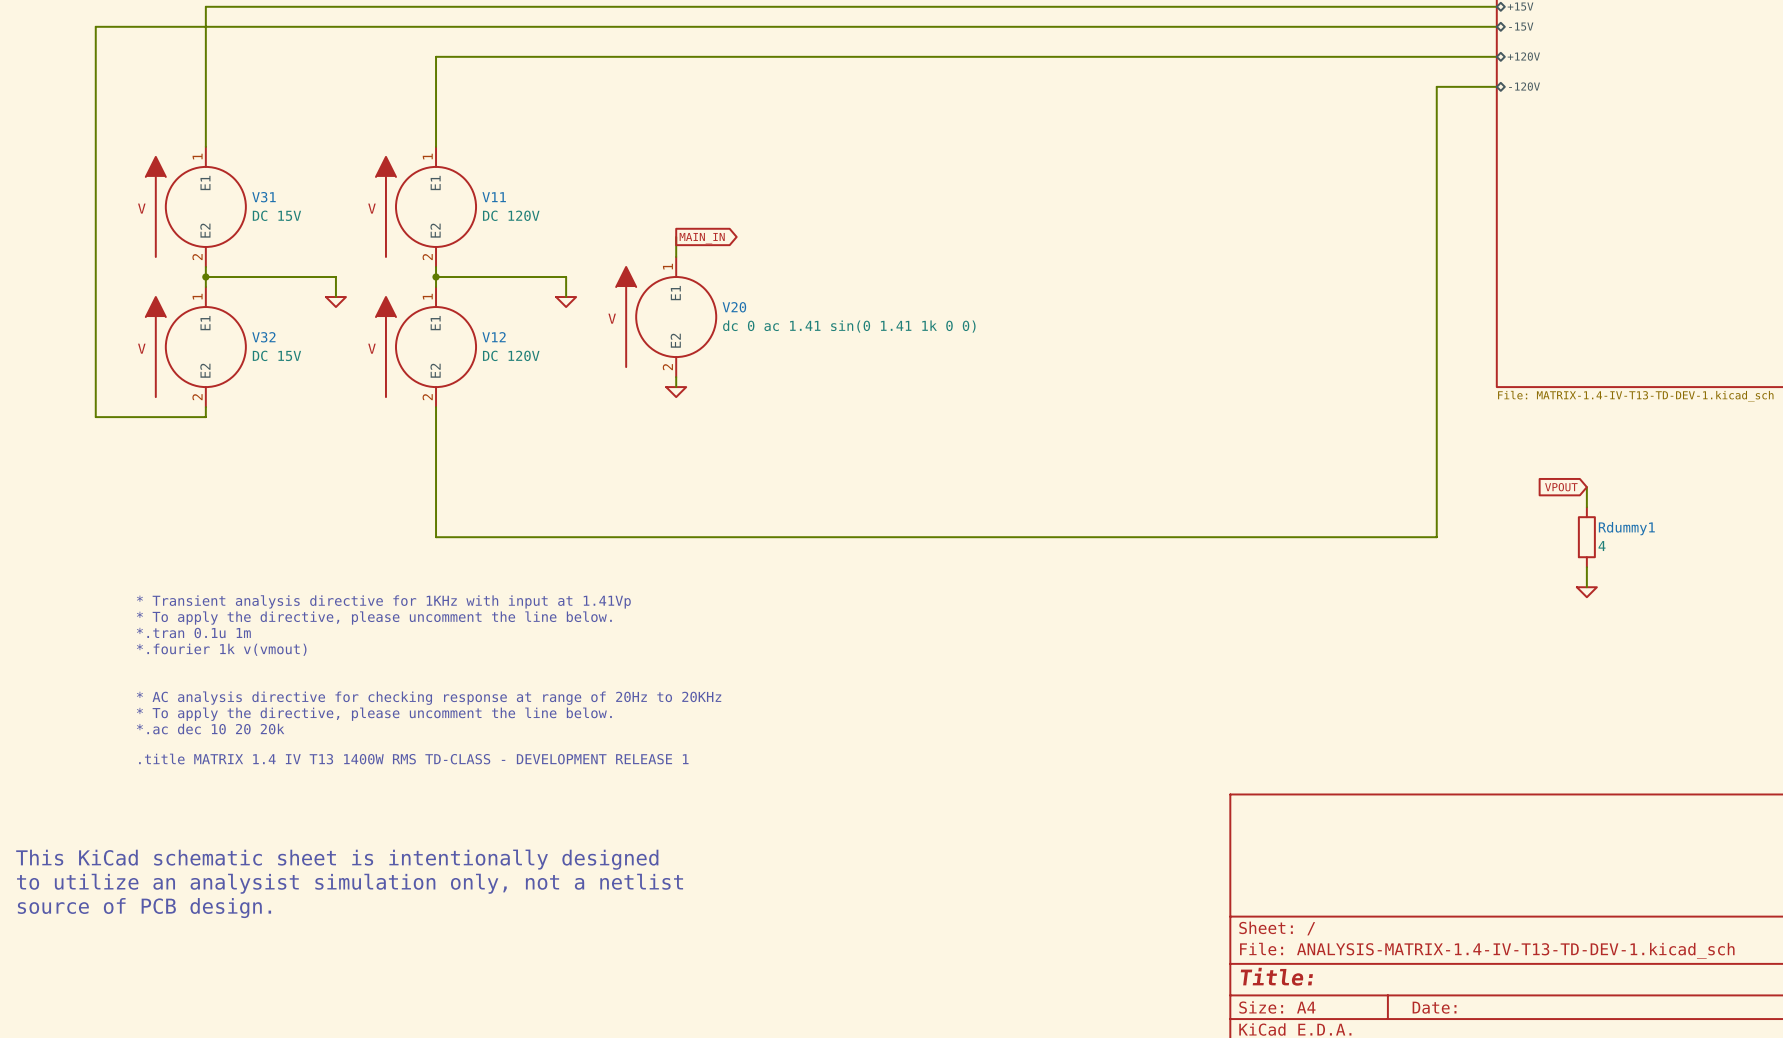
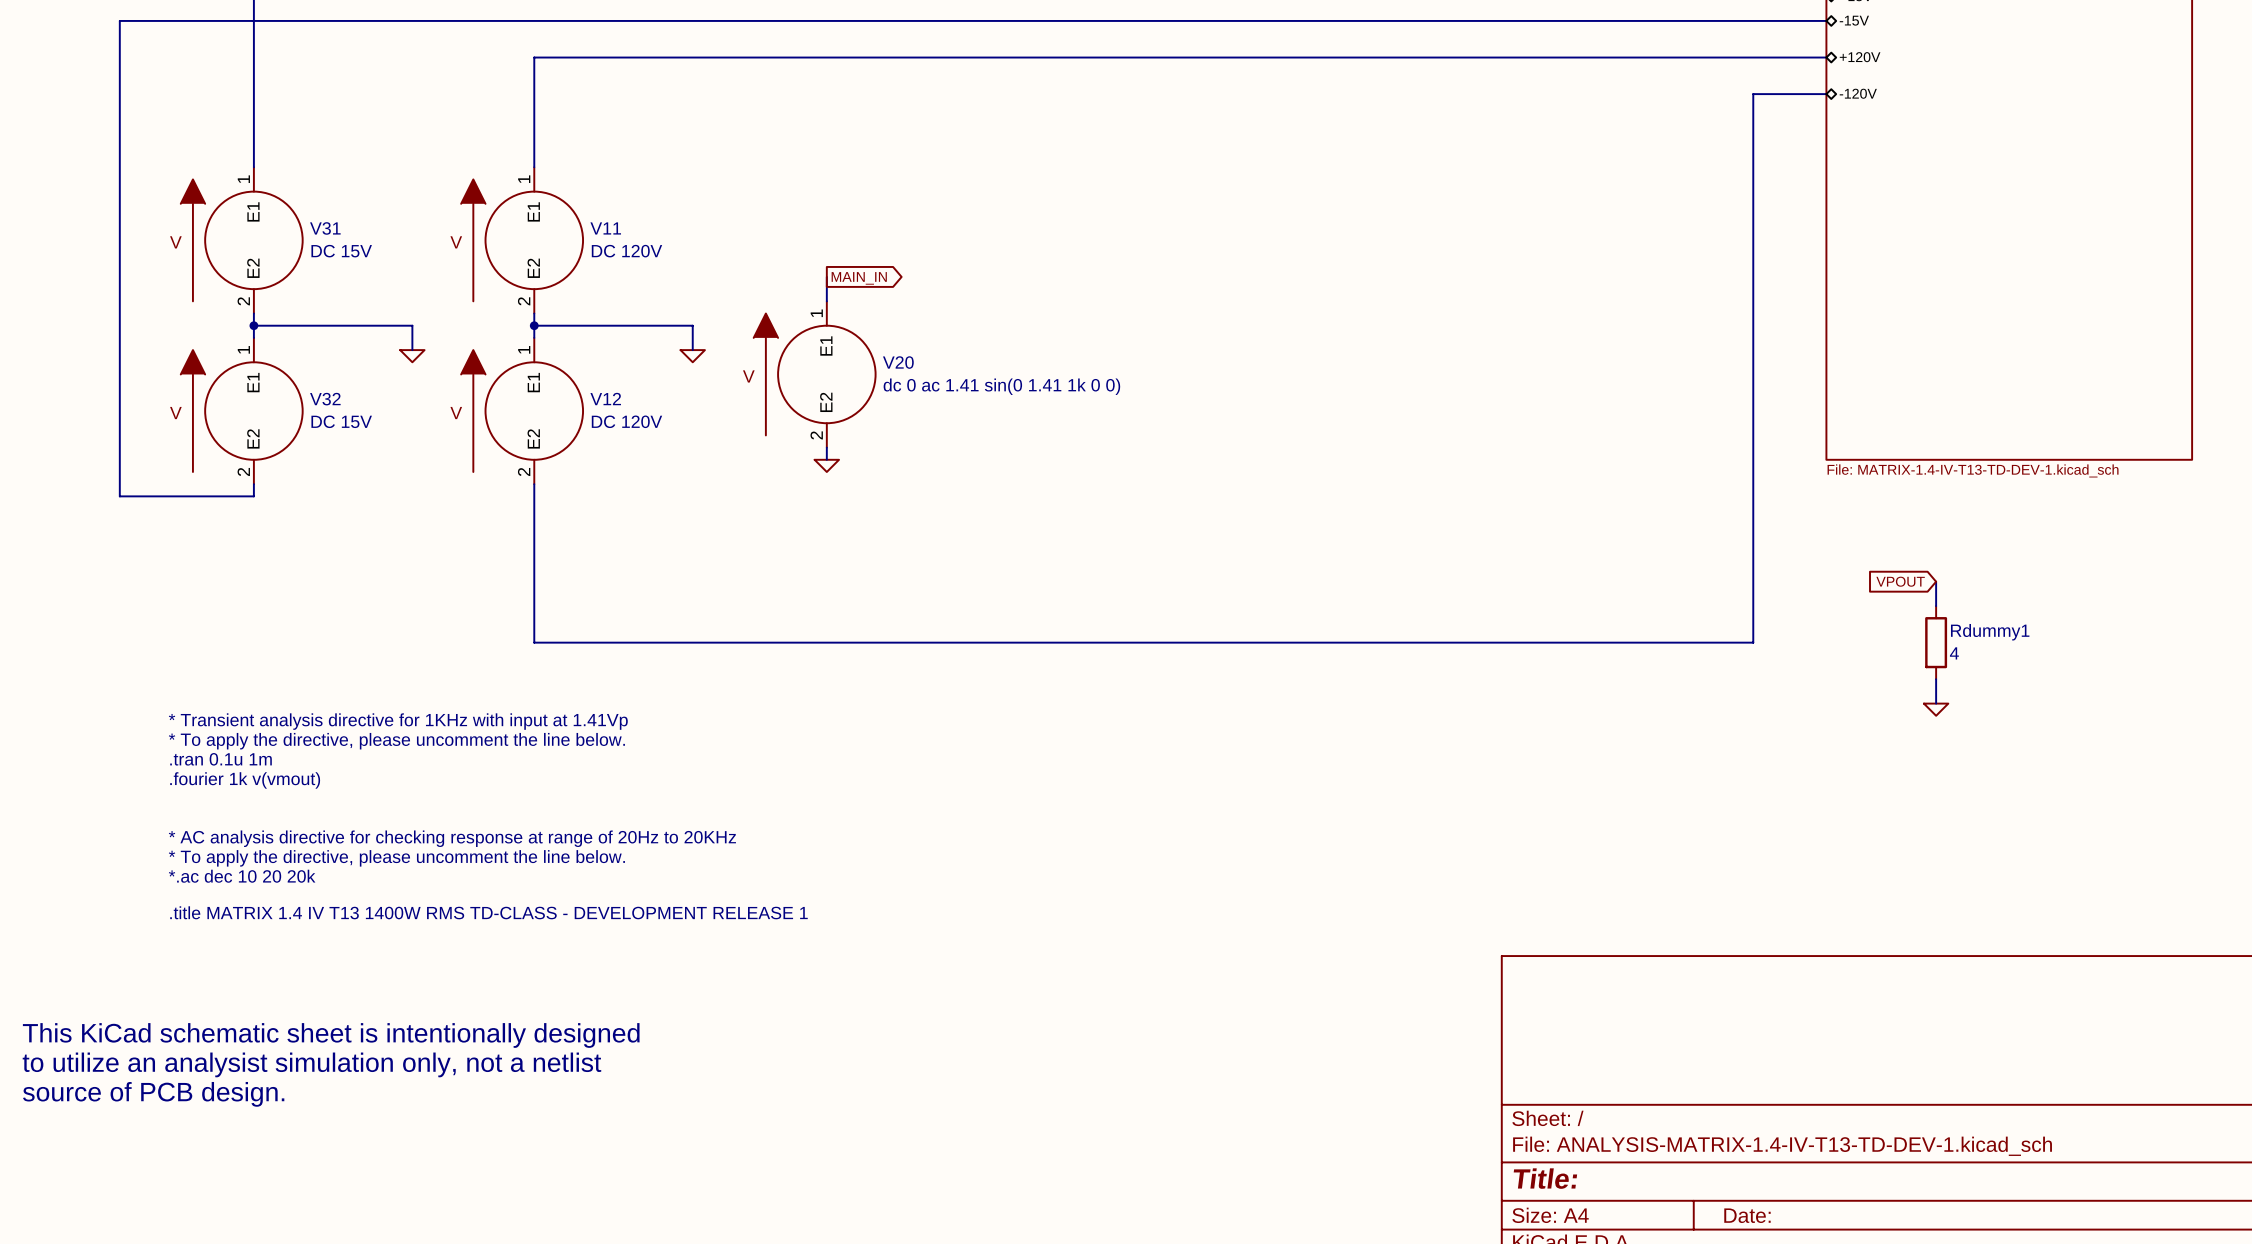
text: *.tran 0.1u 1m (193, 632) -> .tran 0.1u 1m (221, 759)
text: *.fourier 1k v(vmout) (221, 649) -> .fourier 1k v(vmout) (245, 780)

